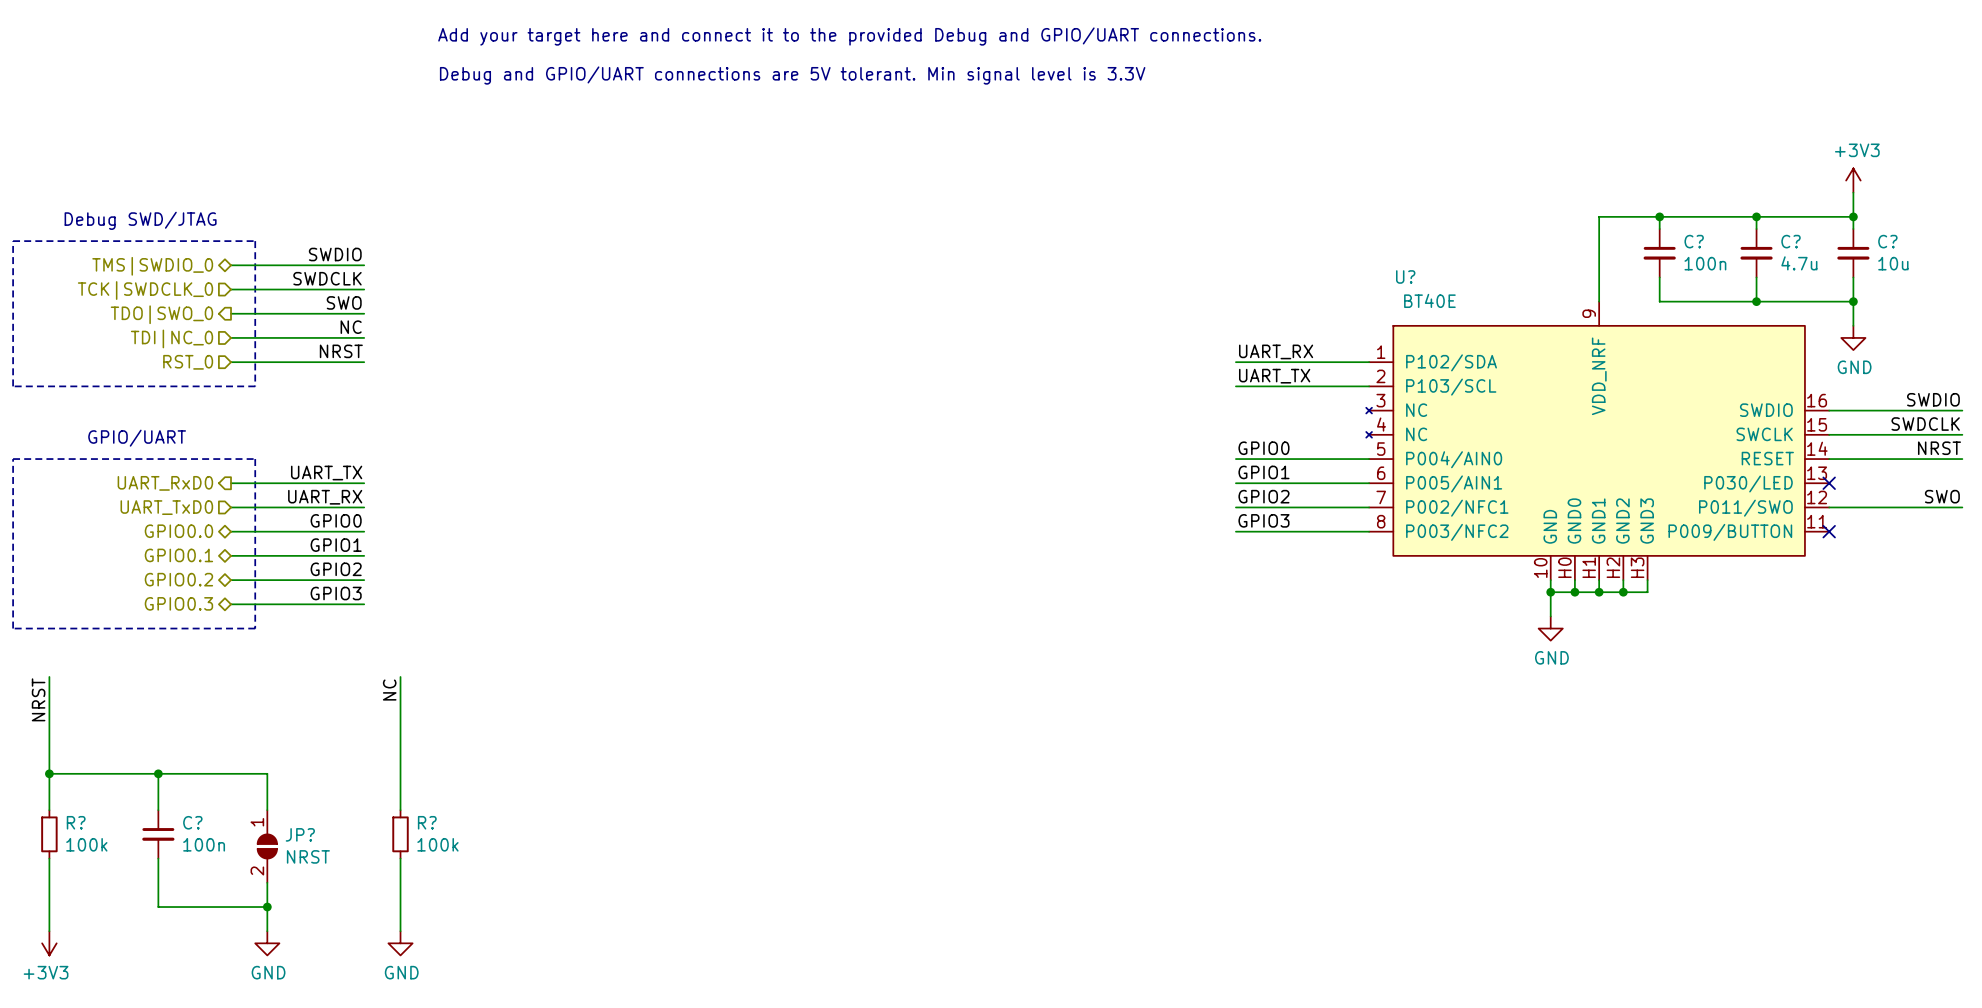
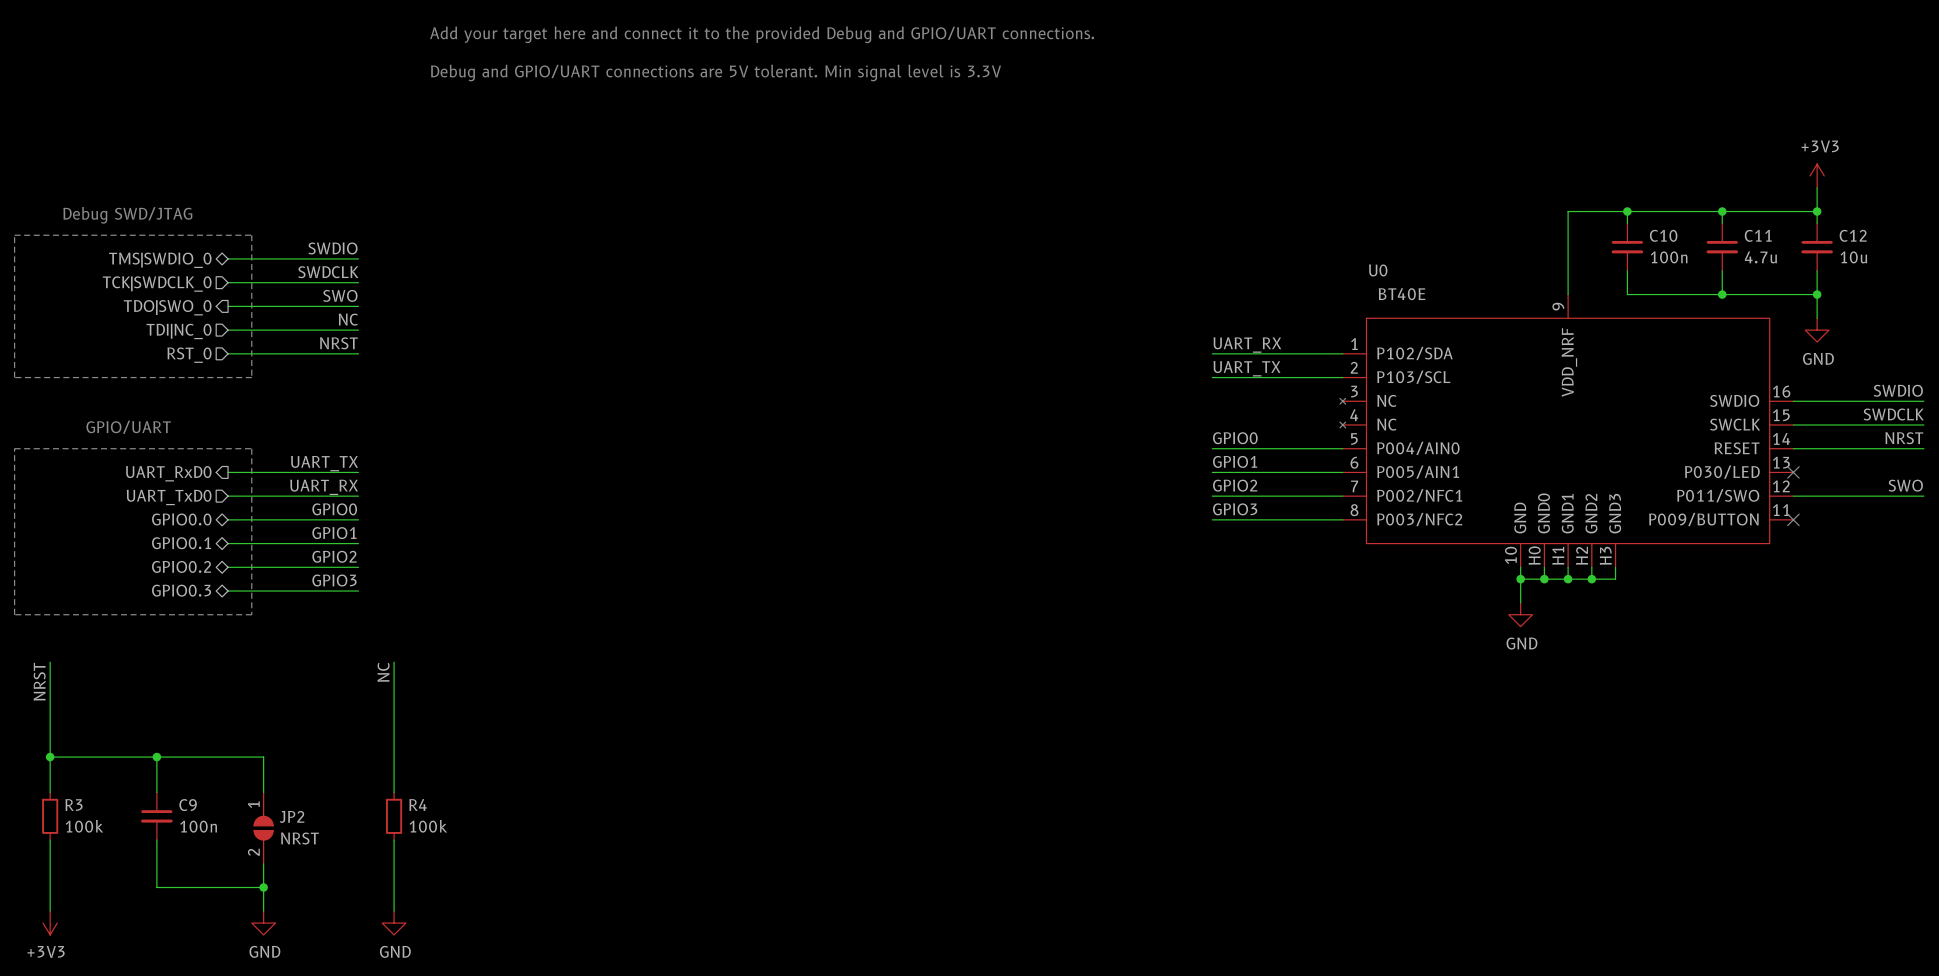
C? name: C? (1694, 241) -> C10 (1663, 235)
C? name: C? (1791, 241) -> C11 (1758, 235)
C? name: C? (1887, 241) -> C12 (1853, 235)
U? name: U? (1405, 276) -> U0 (1378, 270)
R? name: R? (76, 822) -> R3 (73, 805)
C? name: C? (192, 822) -> C9 (188, 805)
R? name: R? (427, 822) -> R4 (418, 804)
JP? name: JP? (300, 834) -> JP2 (292, 816)

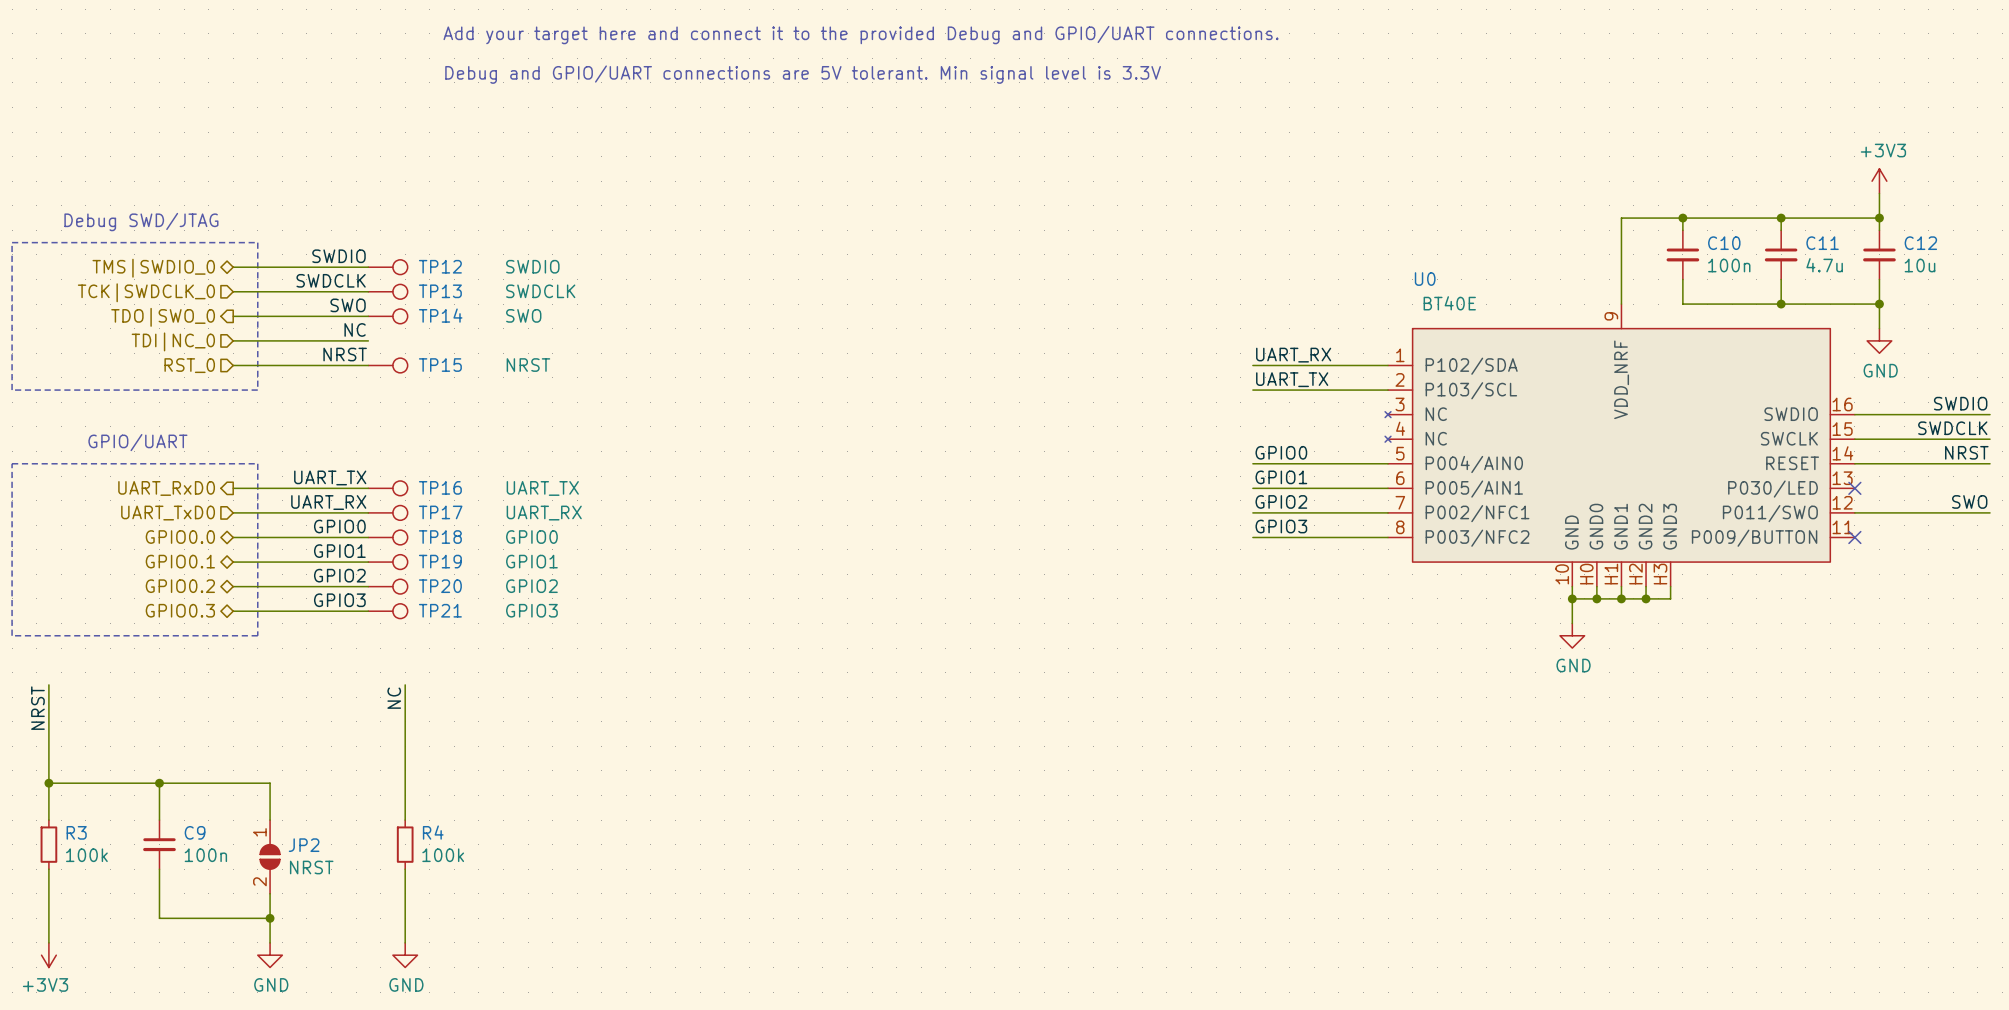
TP12: none -> SWDIO (387, 267)
TP13: none -> SWDCLK (387, 291)
TP14: none -> SWO (387, 316)
TP15: none -> NRST (387, 365)
TP16: none -> UART_TX (387, 488)
TP17: none -> UART_RX (387, 512)
TP18: none -> GPIO0 (387, 537)
TP19: none -> GPIO1 (387, 562)
TP20: none -> GPIO2 (387, 586)
TP21: none -> GPIO3 (387, 611)

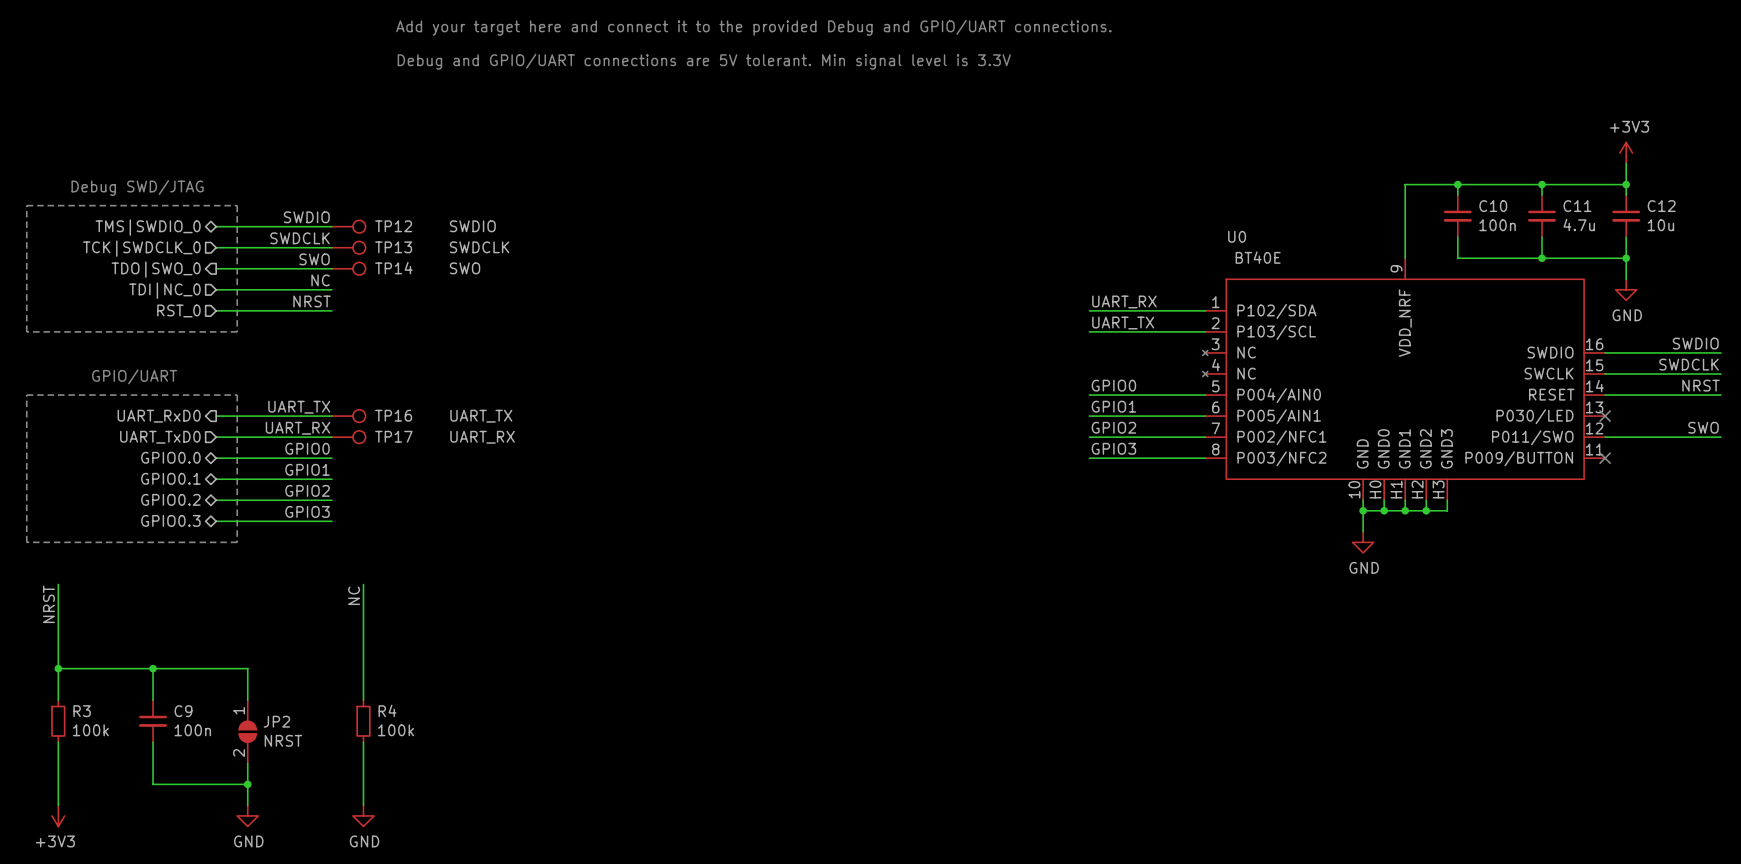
TP15: NRST (387, 365) -> none
TP18: GPIO0 (387, 537) -> none
TP19: GPIO1 (387, 562) -> none
TP20: GPIO2 (387, 586) -> none
TP21: GPIO3 (387, 611) -> none

